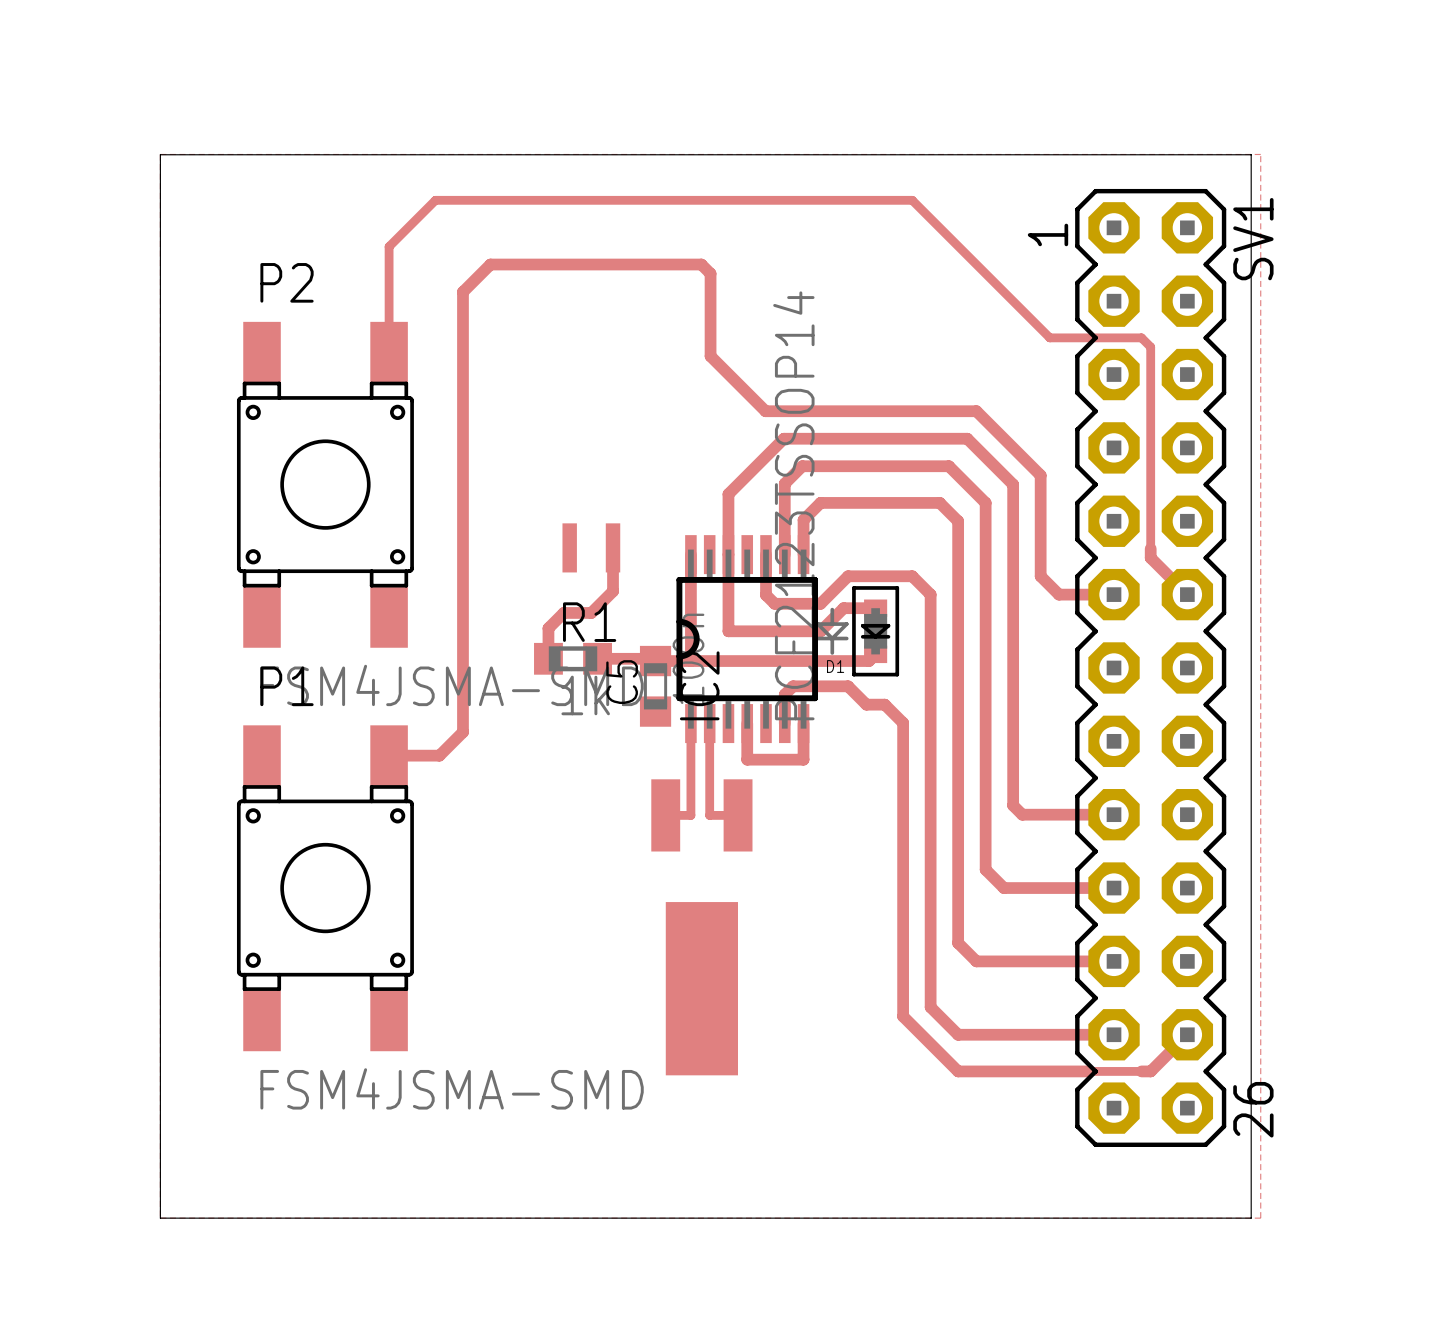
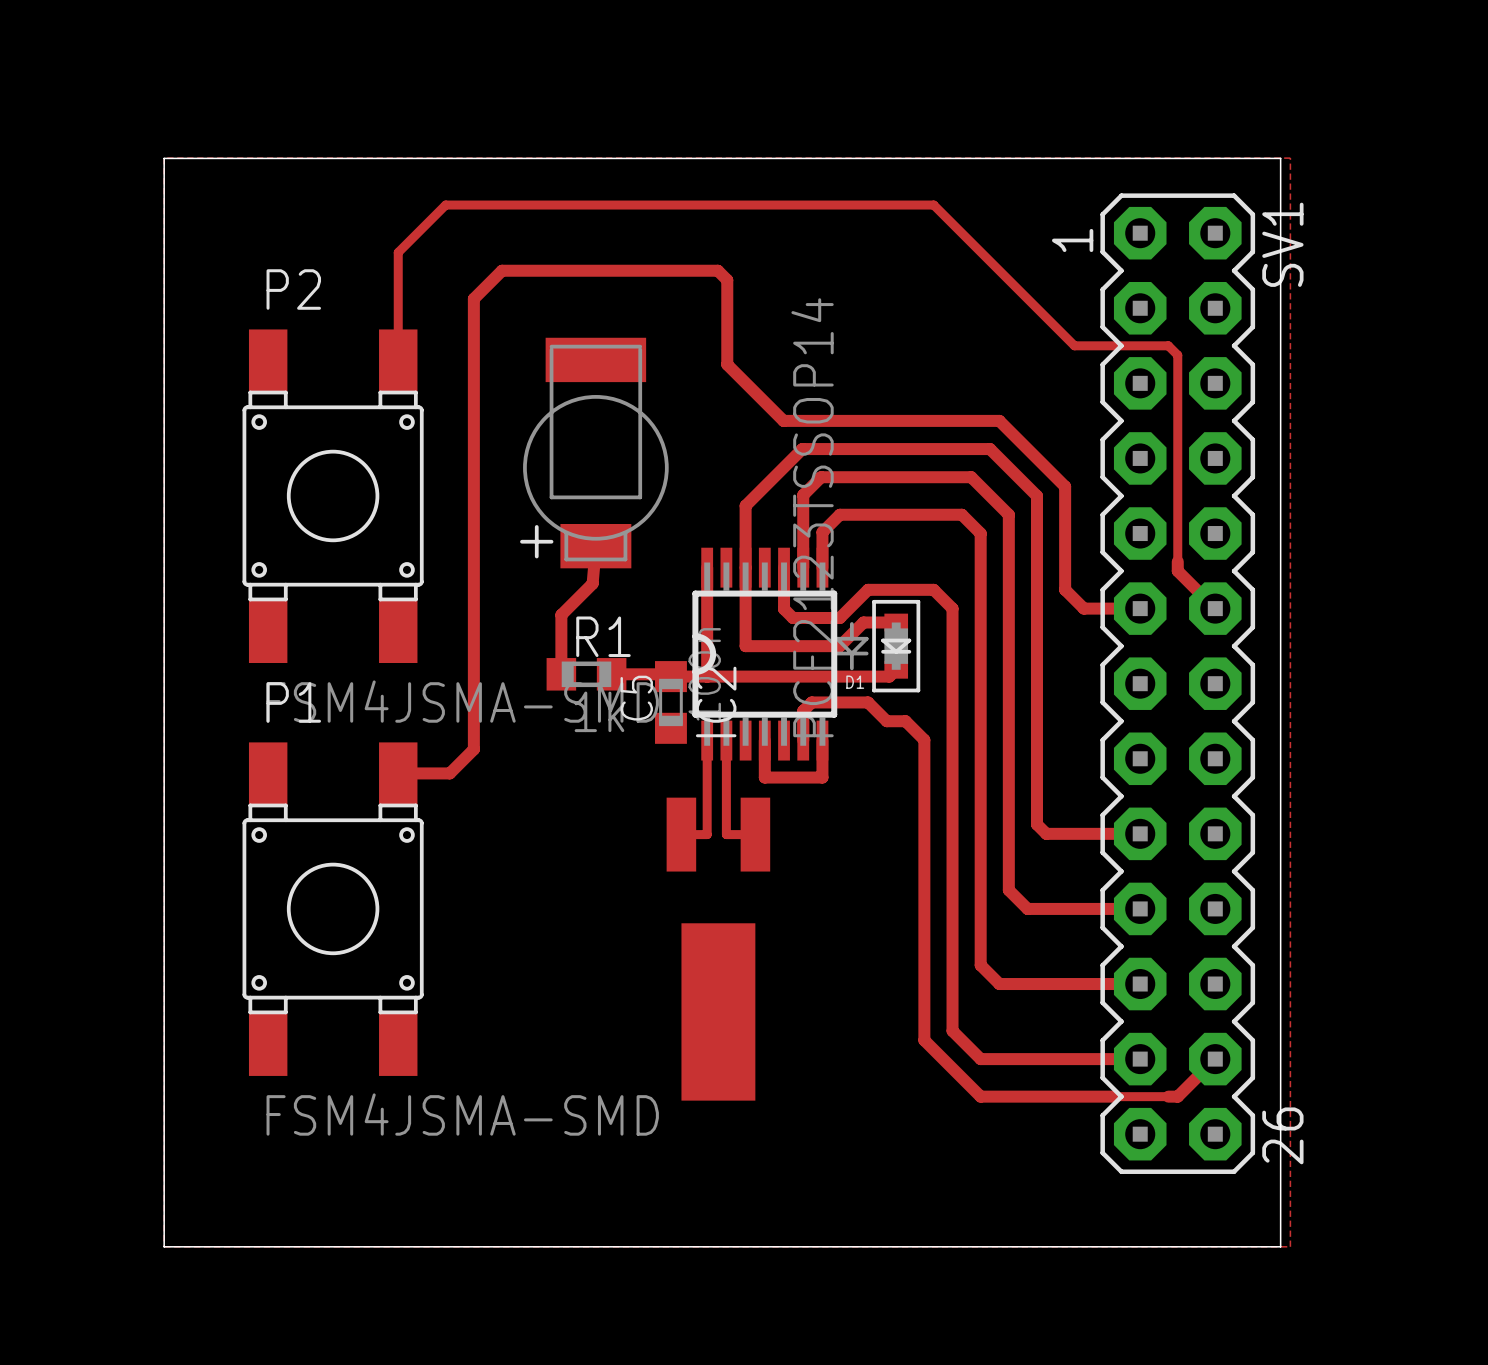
part: none -> (594, 453)
part: (591, 547) -> none
track: (613, 547) (613, 591) (591, 612) (563, 612) (548, 628) -> (595, 546) (592, 583) (561, 614) (561, 643)

